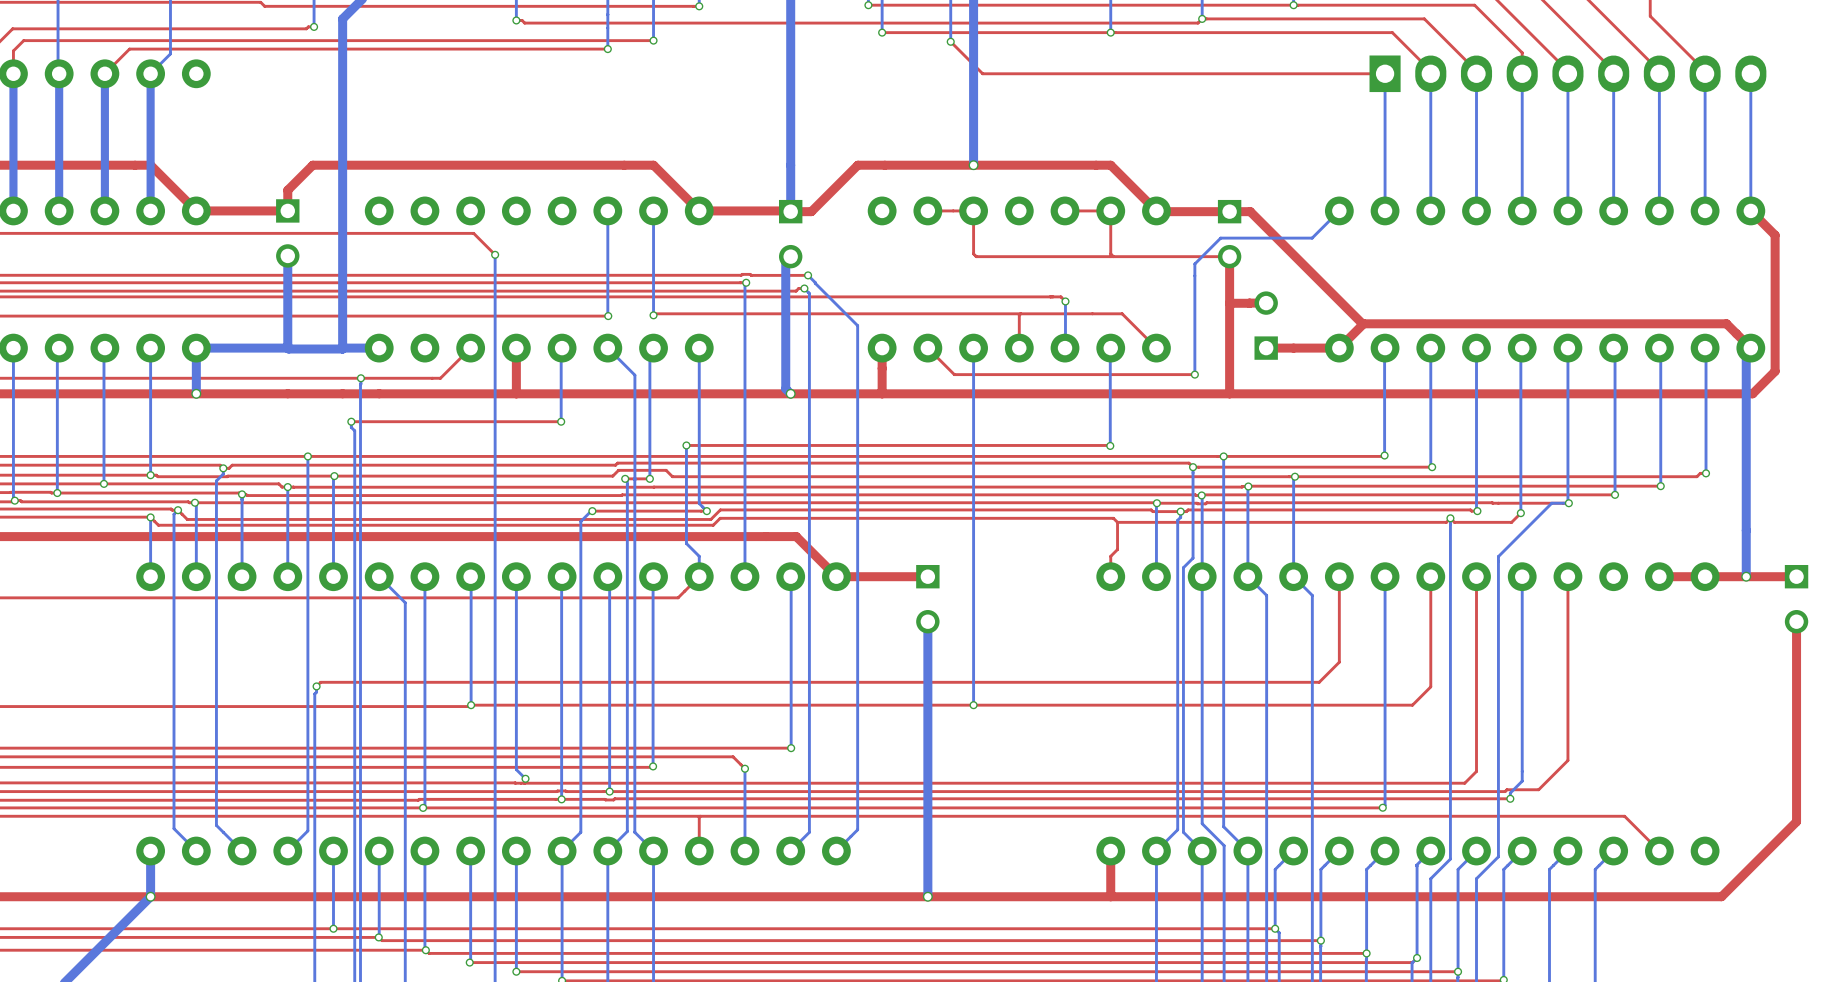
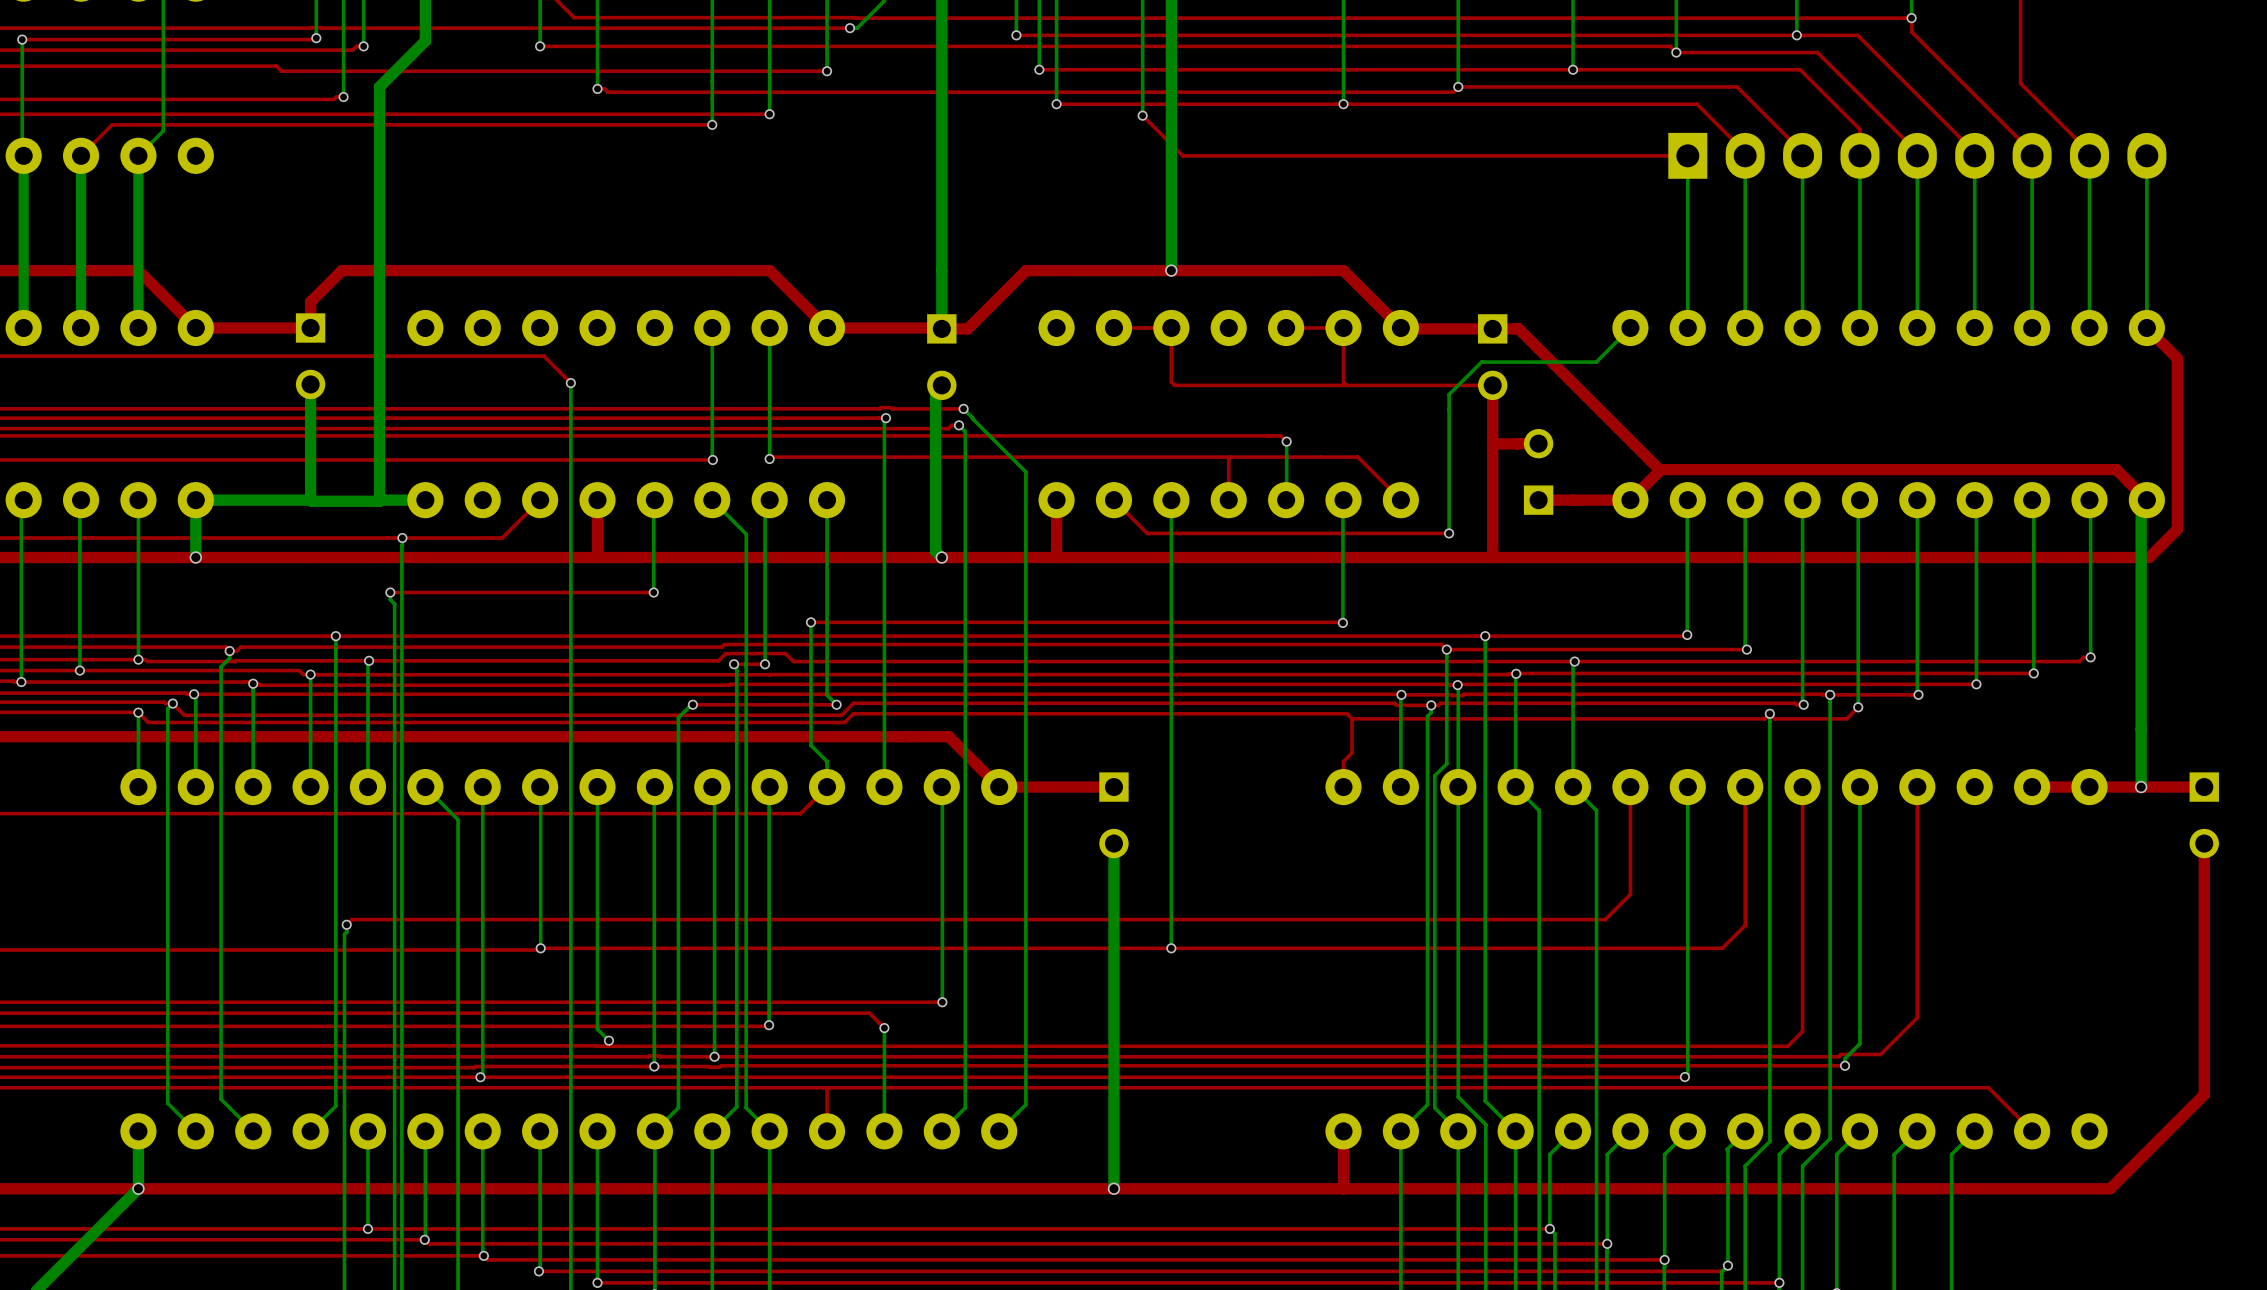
via: none -> (1830, 694)
bottom track: (1568, 503) (1551, 503) (1498, 556) -> (1830, 694) (1830, 761)

